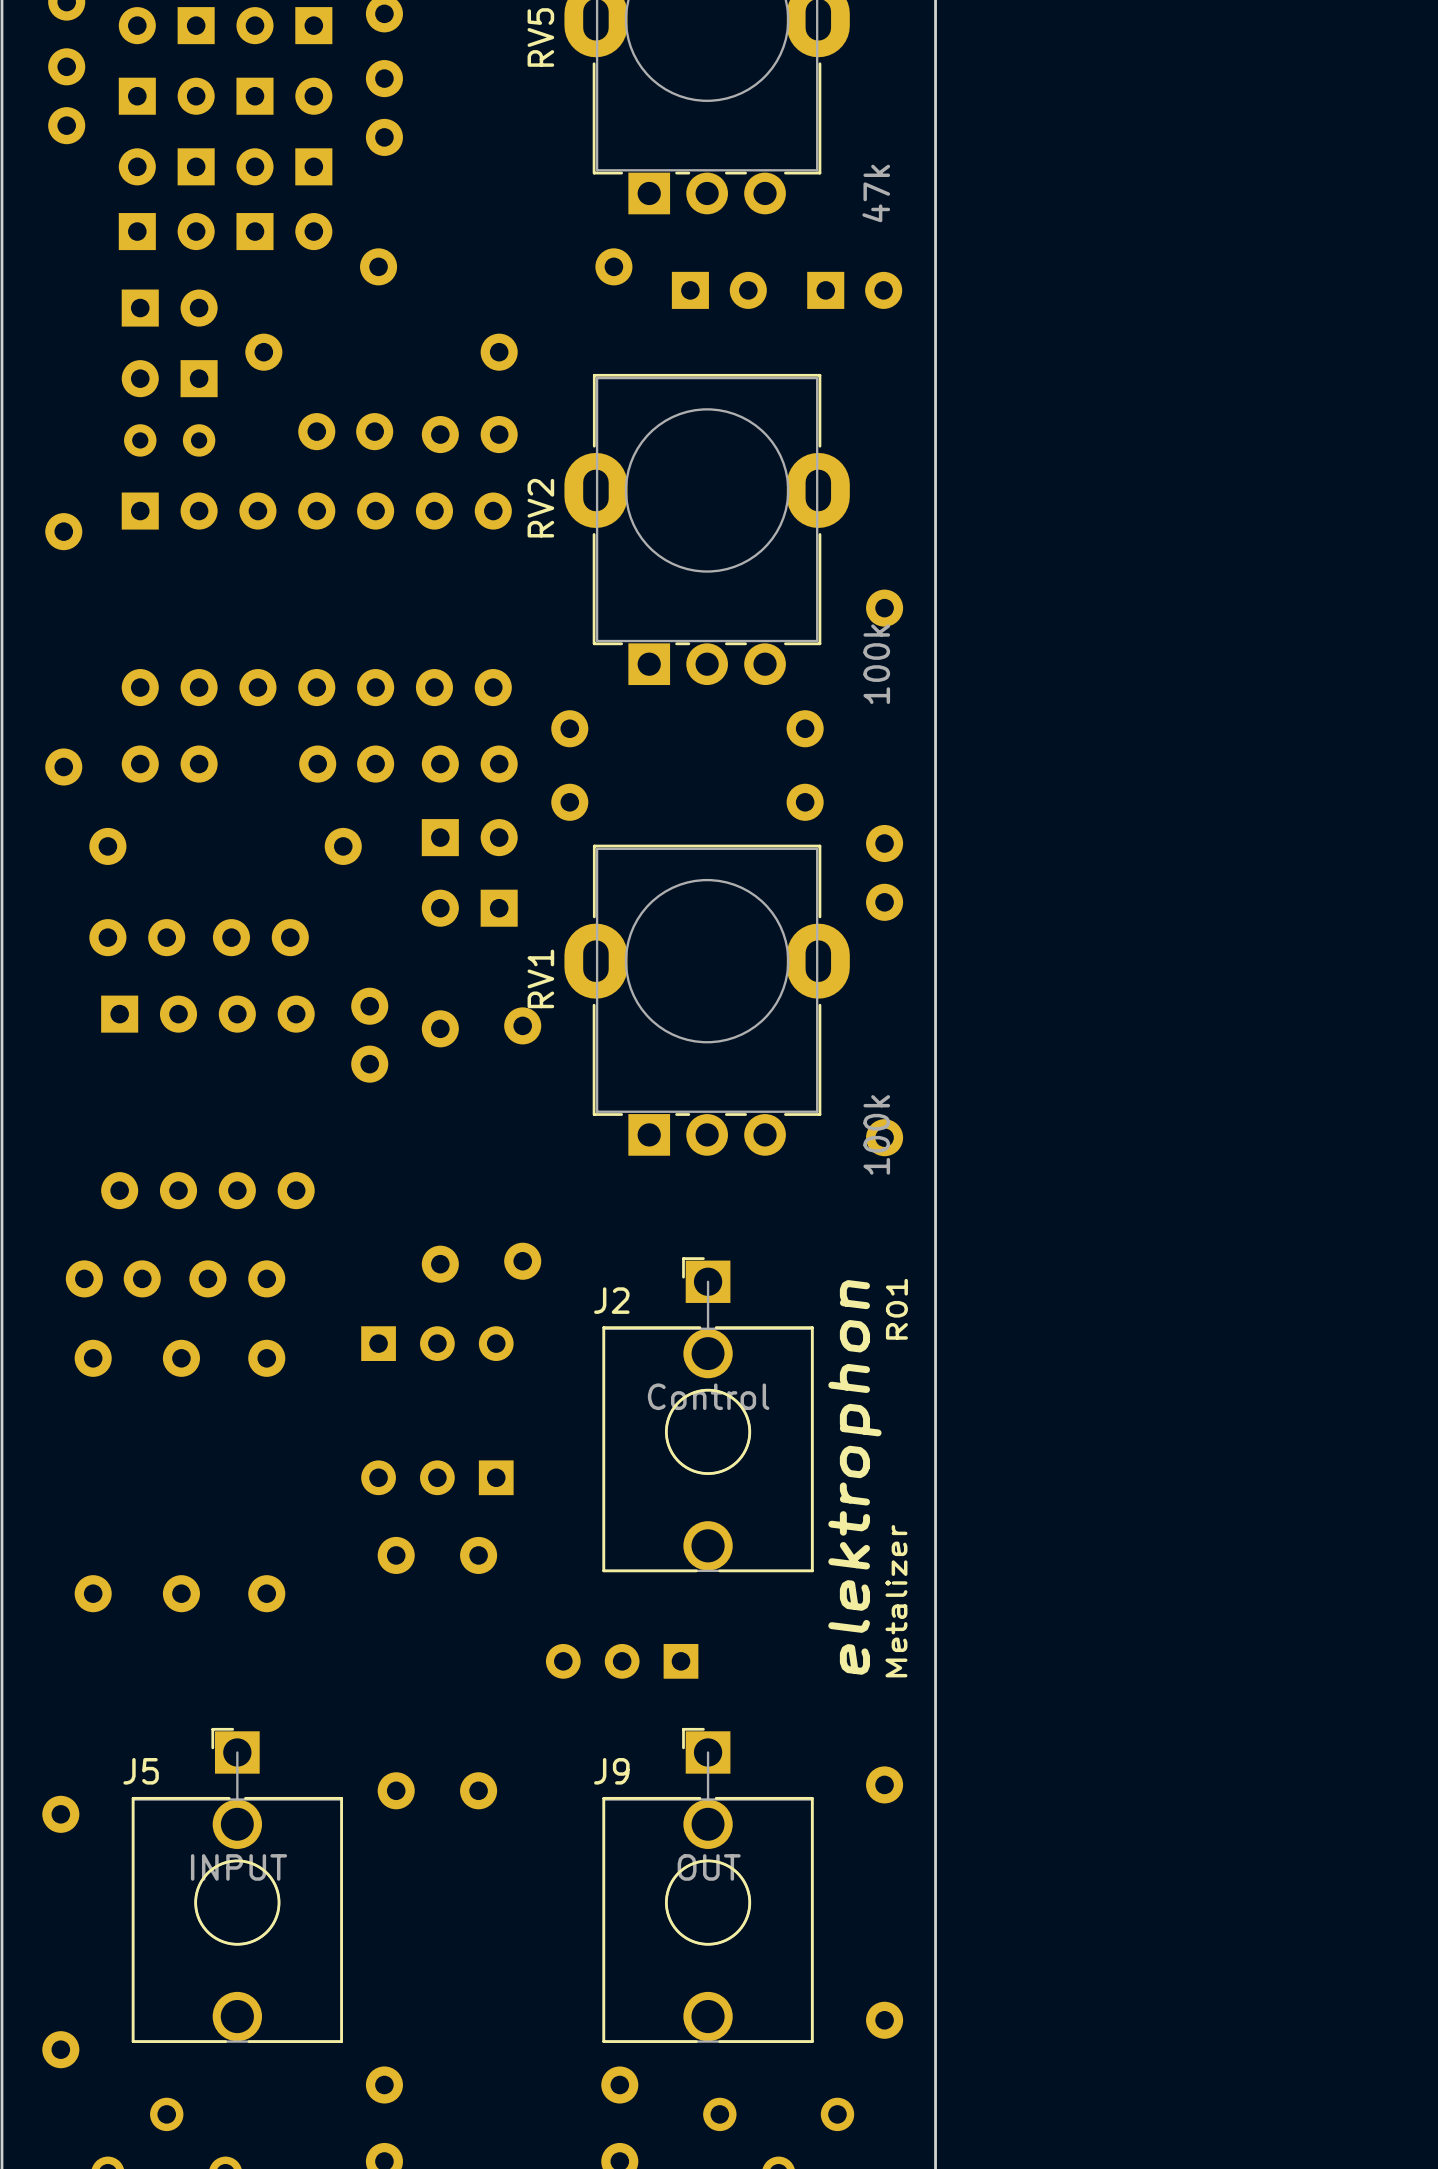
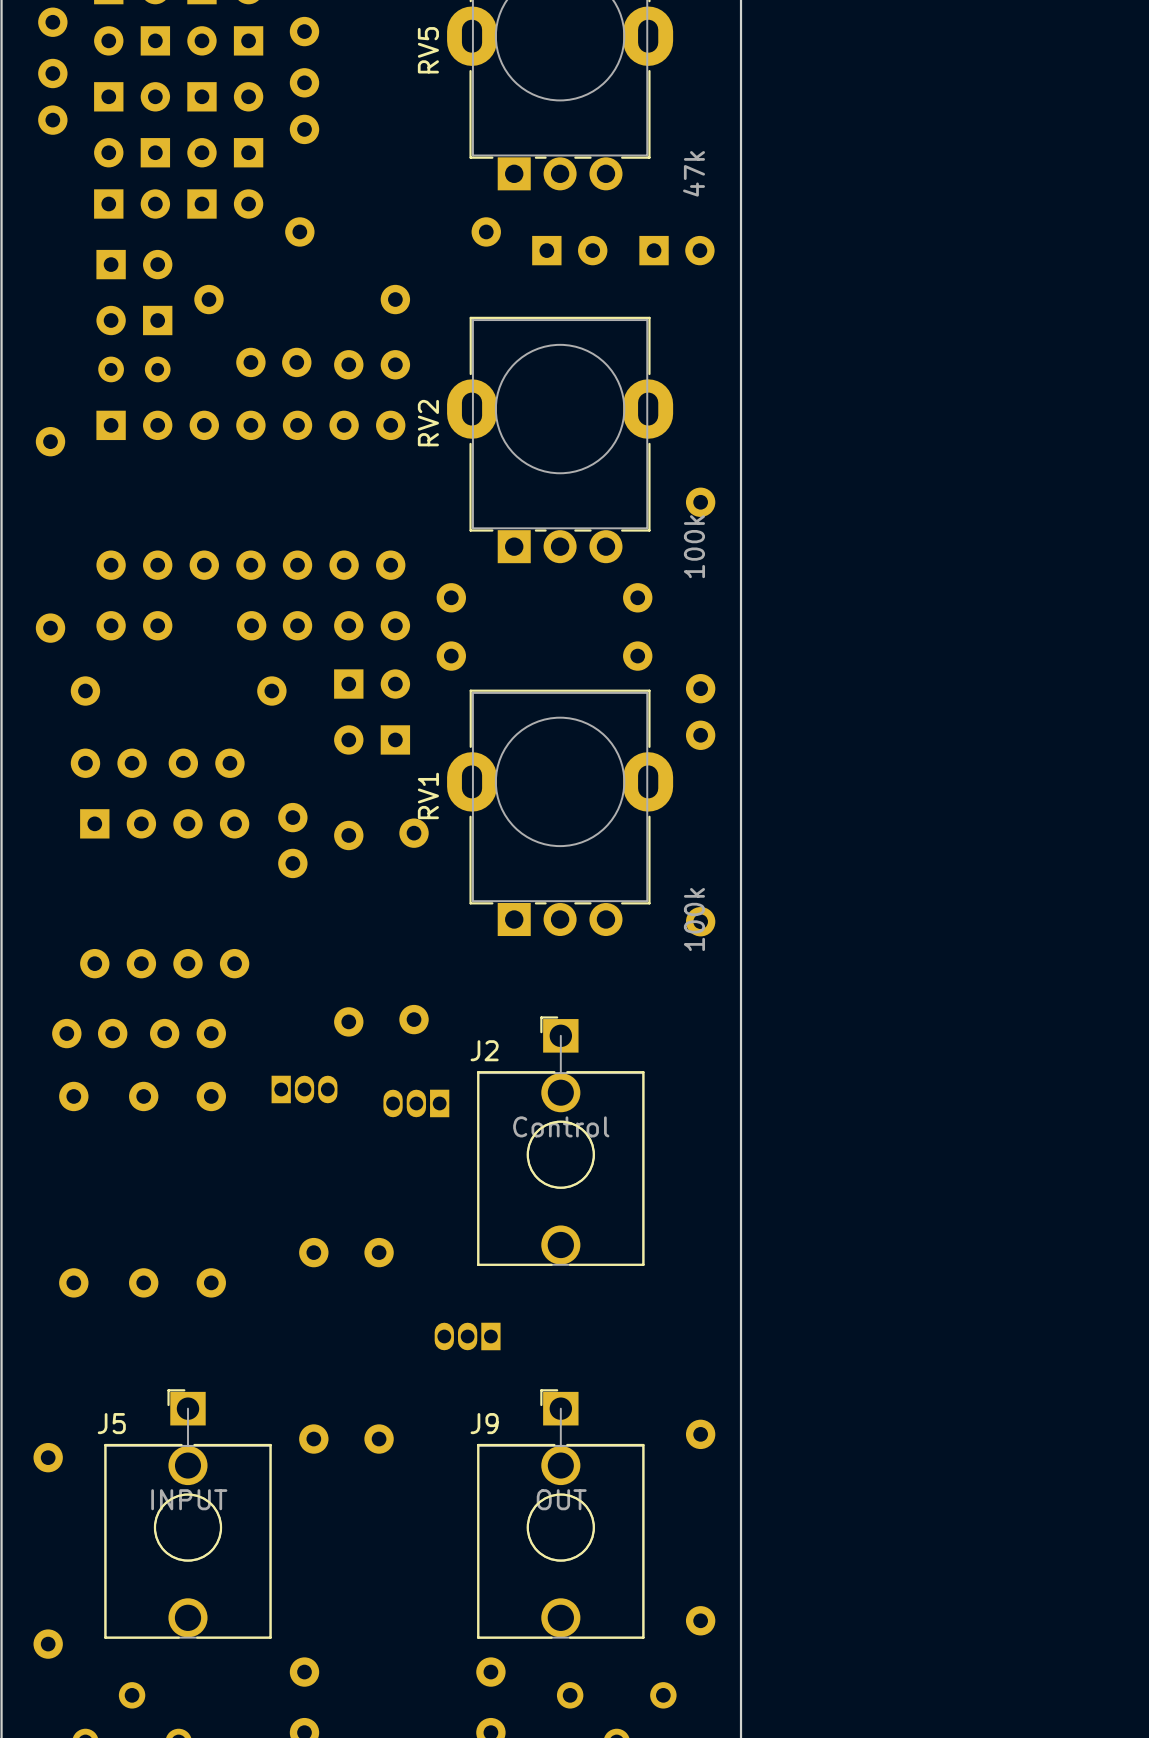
drawing: [828, 1278, 908, 1678] -> none
part: (437, 1343) -> none
part: none -> (304, 1089)
part: none -> (416, 1103)
part: (437, 1477) -> none
part: none -> (467, 1336)
part: (622, 1661) -> none

